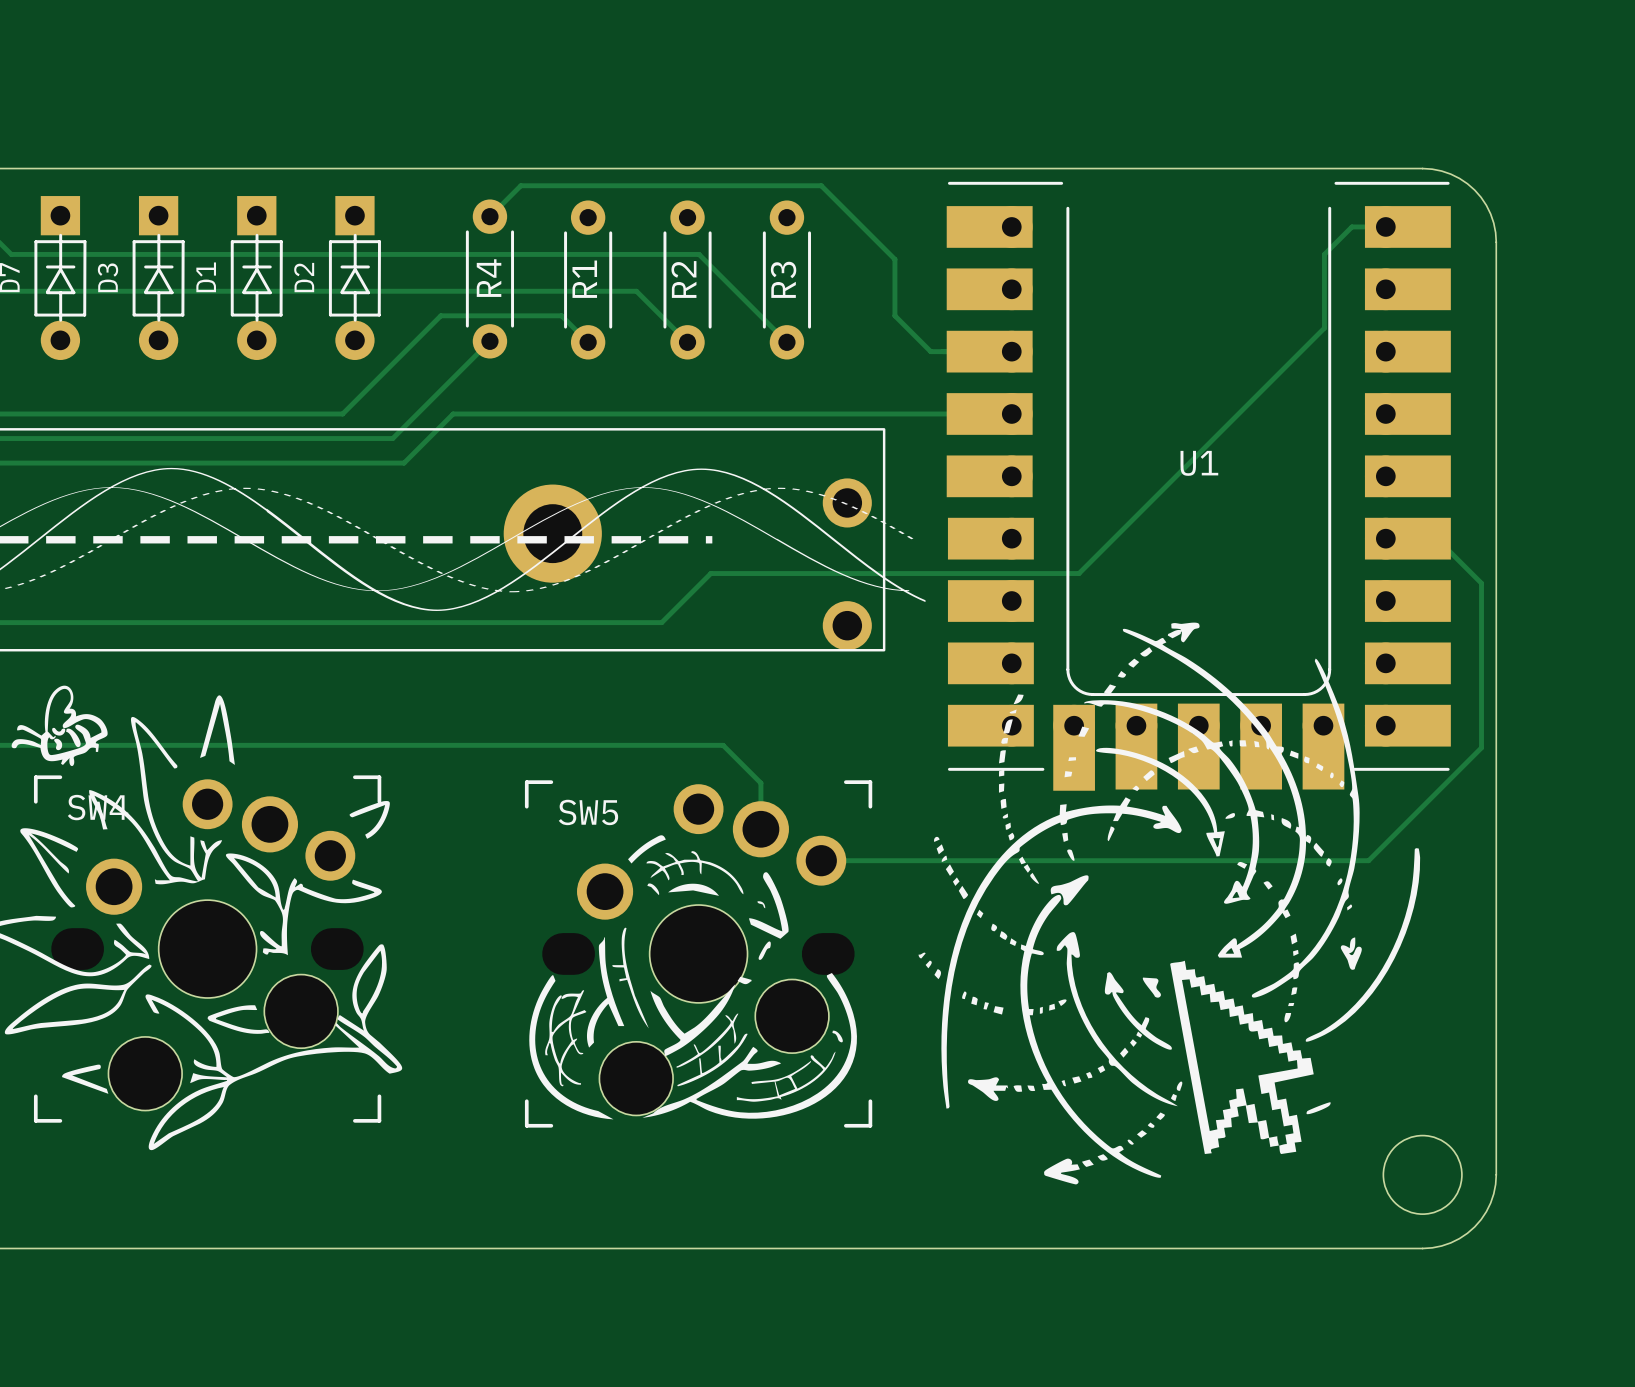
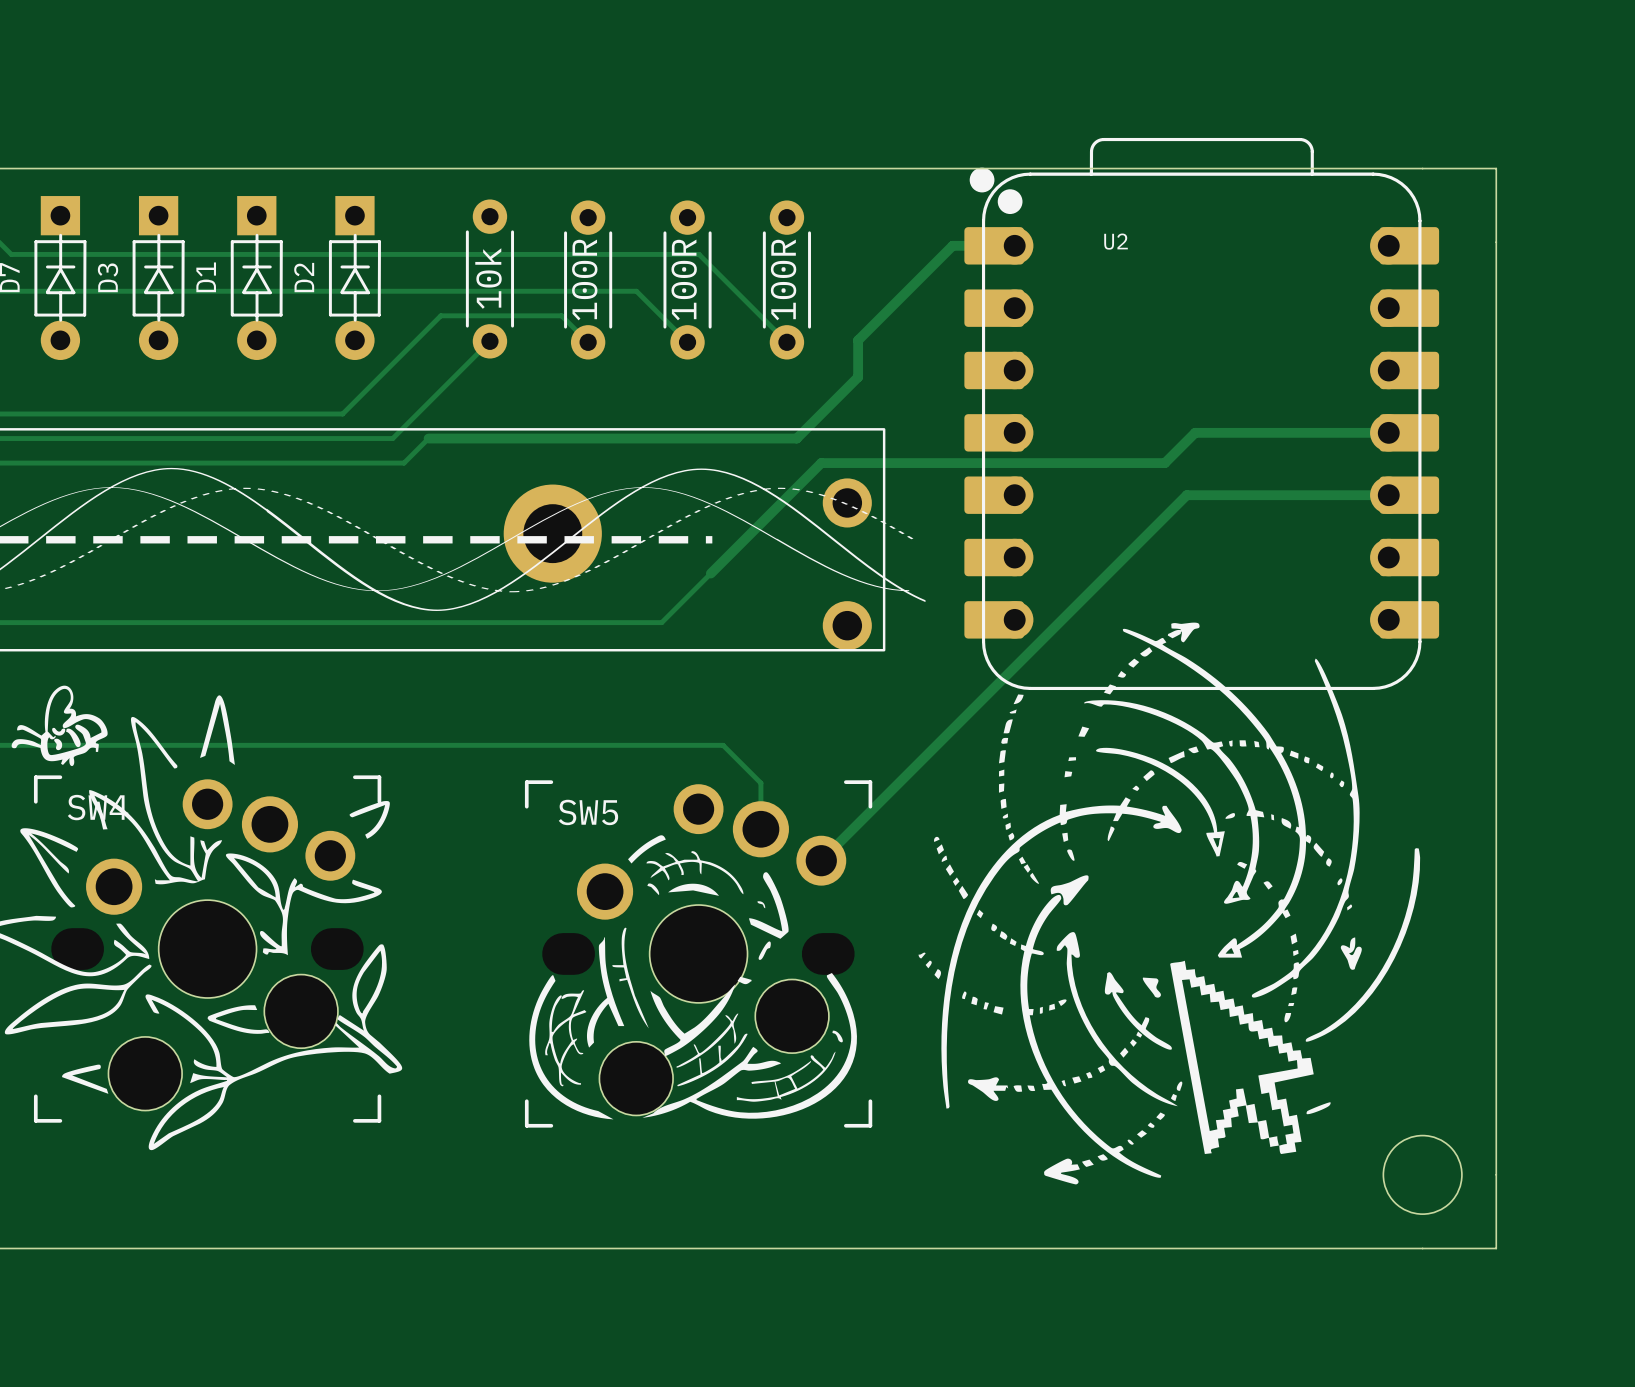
board edge: (1422, 168) (1450, 174) (1474, 190) (1490, 214) (1496, 242) -> (1422, 168) (1496, 168) (1496, 242)
track: (489, 216) (520, 185) (821, 185) (894, 259) (894, 315) (930, 351) (1011, 351) -> none
track: (1407, 226) (1351, 226) (1324, 254) (1324, 328) (1079, 573) (710, 573) -> (1388, 432) (1195, 432) (1164, 463) (821, 463) (710, 573)
R4 name: R4 (489, 278) -> 10k (488, 278)
R1 name: R1 (584, 279) -> 100R (584, 279)
R2 name: R2 (683, 279) -> 100R (684, 279)
R3 name: R3 (783, 279) -> 100R (783, 279)
track: (989, 413) (453, 413) (428, 438) -> (1014, 245) (952, 245) (858, 340) (858, 377) (796, 438) (428, 438)
U2: none -> (1201, 413)
U1: (1198, 486) -> none
track: (1407, 538) (1436, 538) (1481, 583) (1481, 747) (1368, 860) (821, 860) -> (1388, 495) (1186, 495) (821, 860)
board edge: (1496, 1174) (1490, 1203) (1474, 1226) (1450, 1242) (1422, 1248) -> (1496, 1174) (1496, 1248) (1422, 1248)

